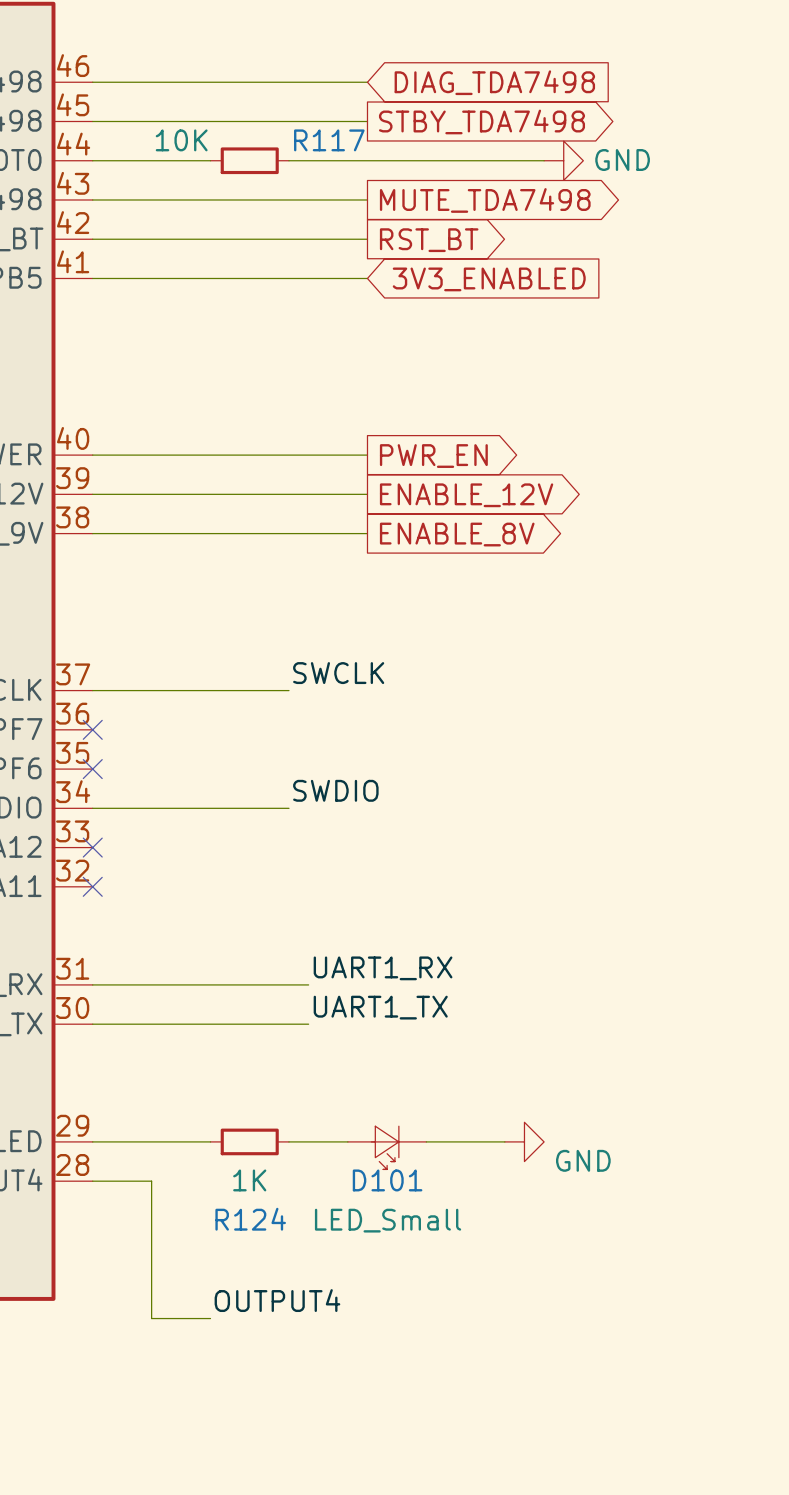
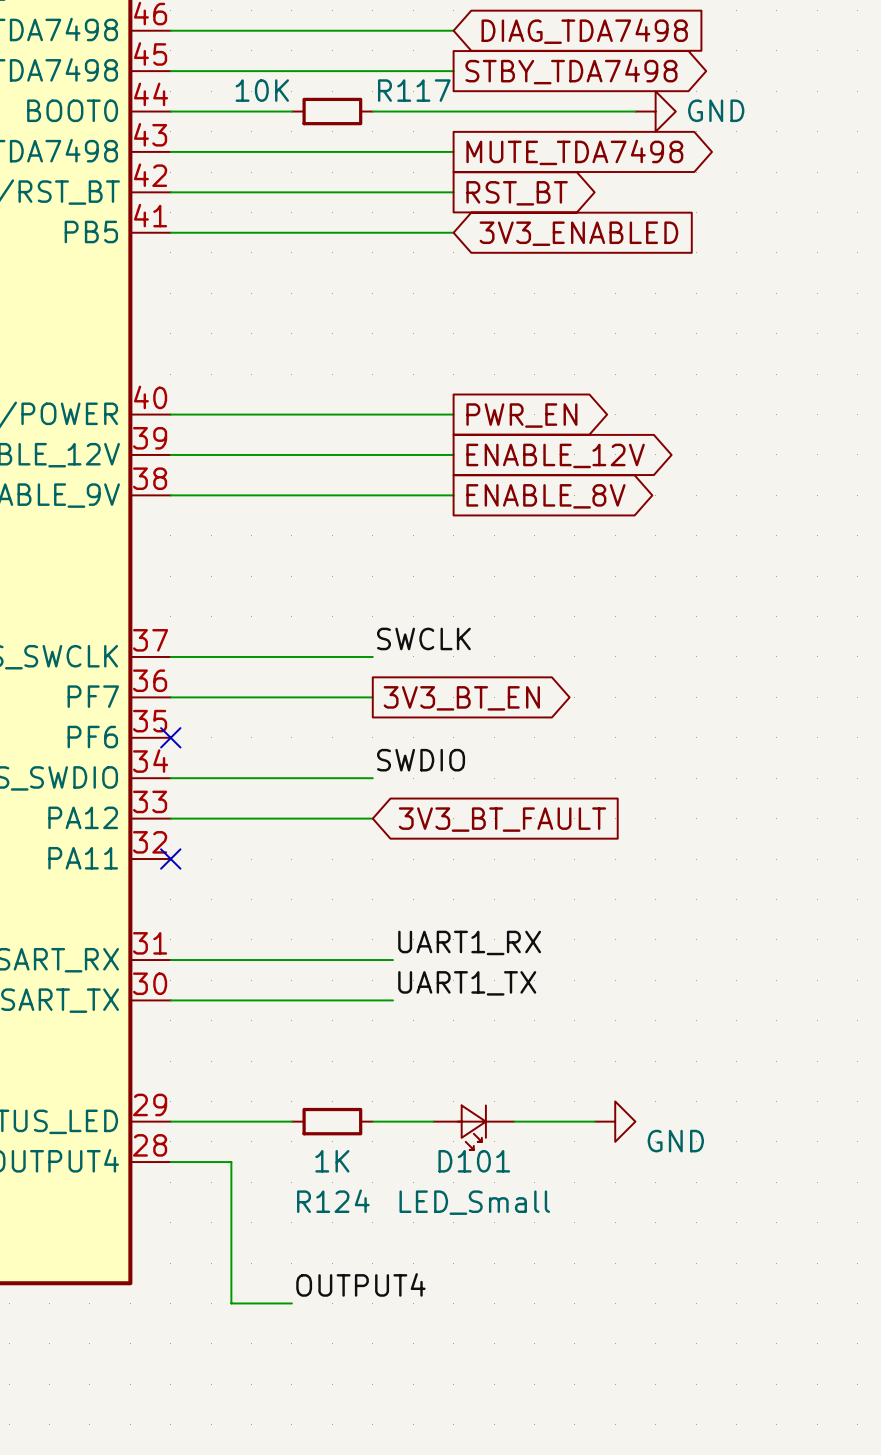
wire: none -> (170, 697) (372, 697)
no-connect mark: (92, 729) -> none
global label: none -> 3V3_BT_EN (461, 698)
wire: none -> (170, 818) (372, 818)
no-connect mark: (92, 847) -> none
global label: none -> 3V3_BT_FAULT (502, 819)

